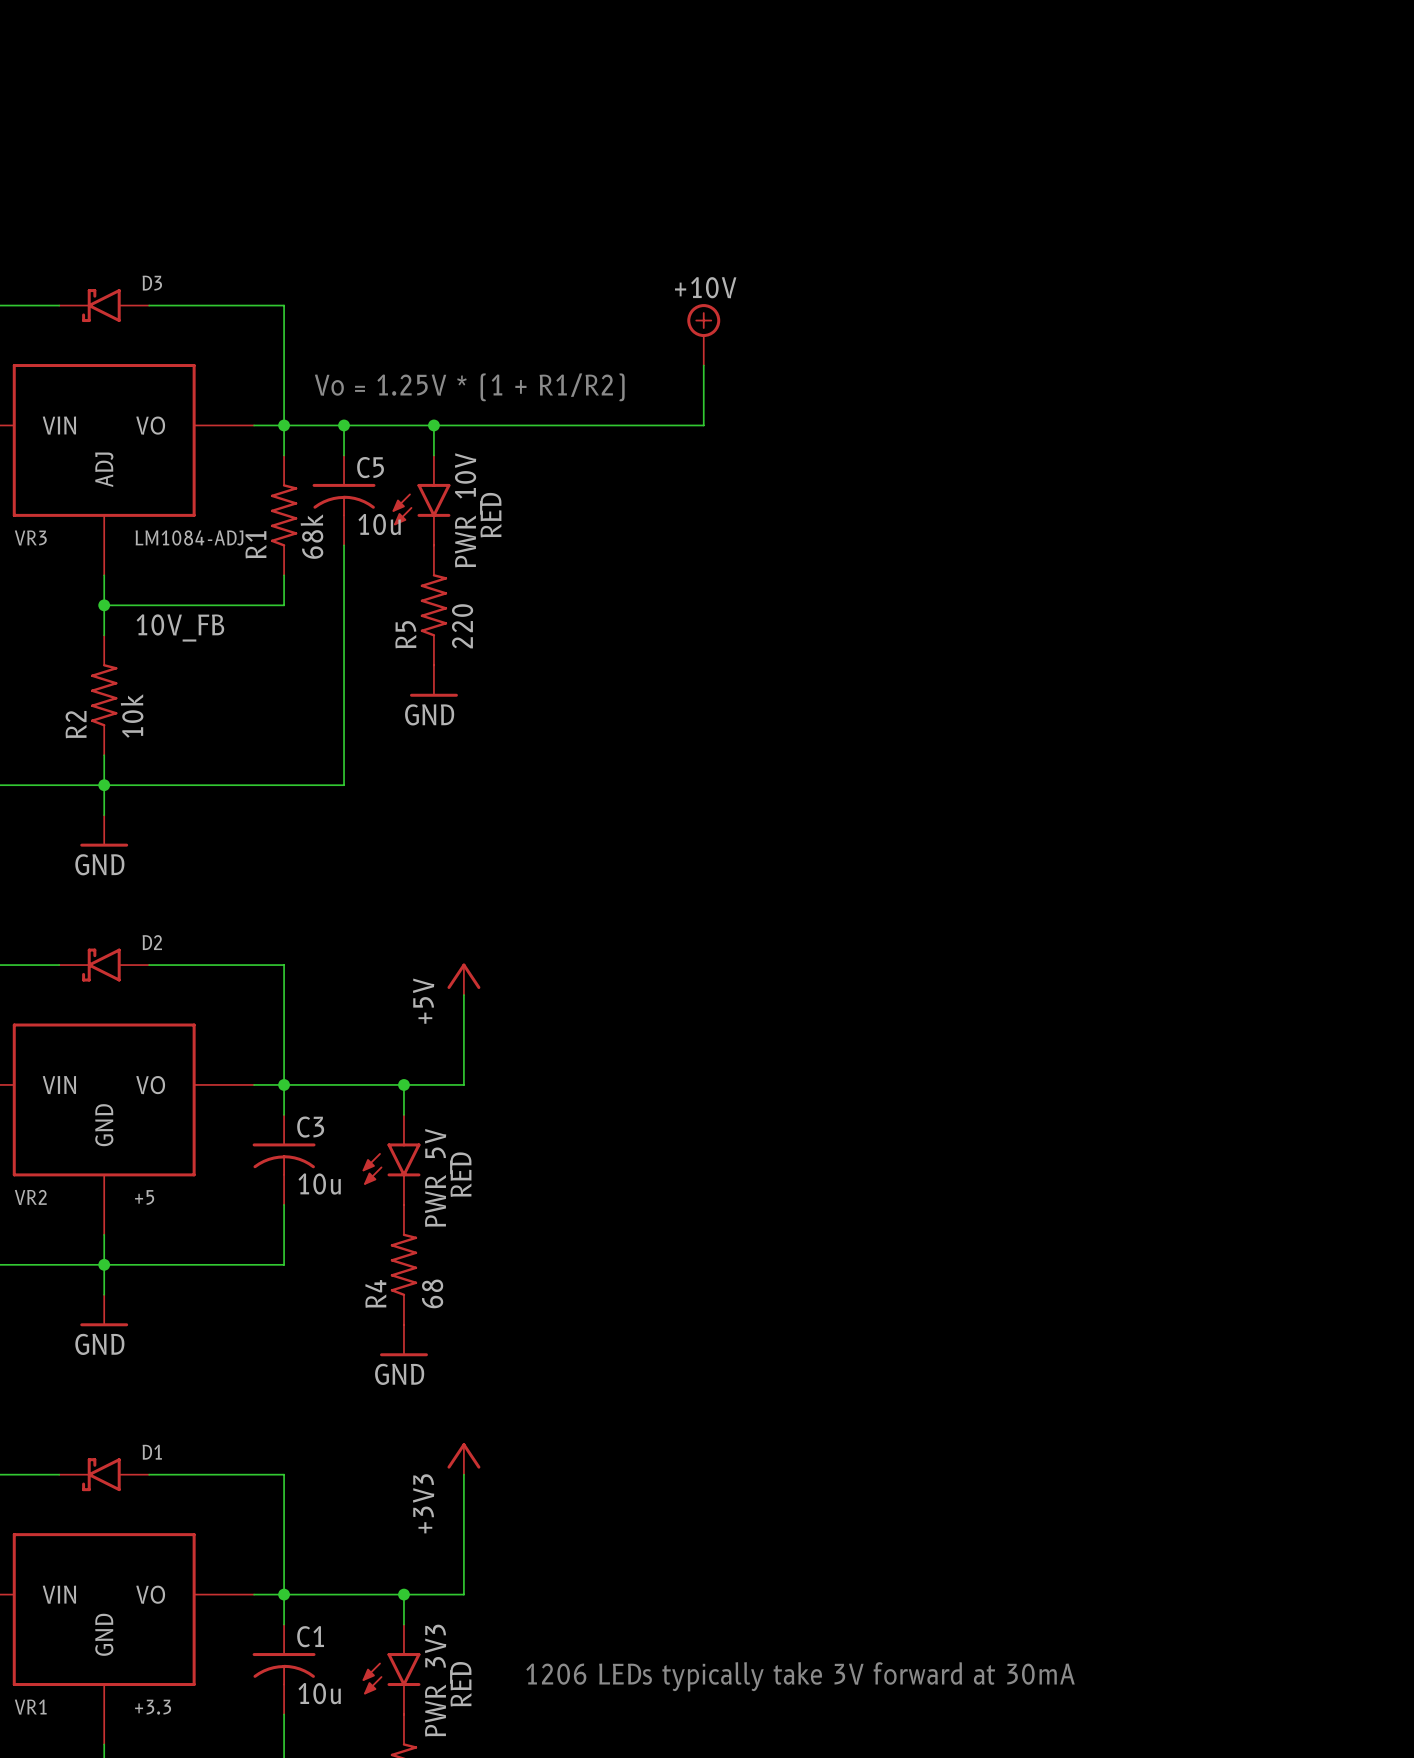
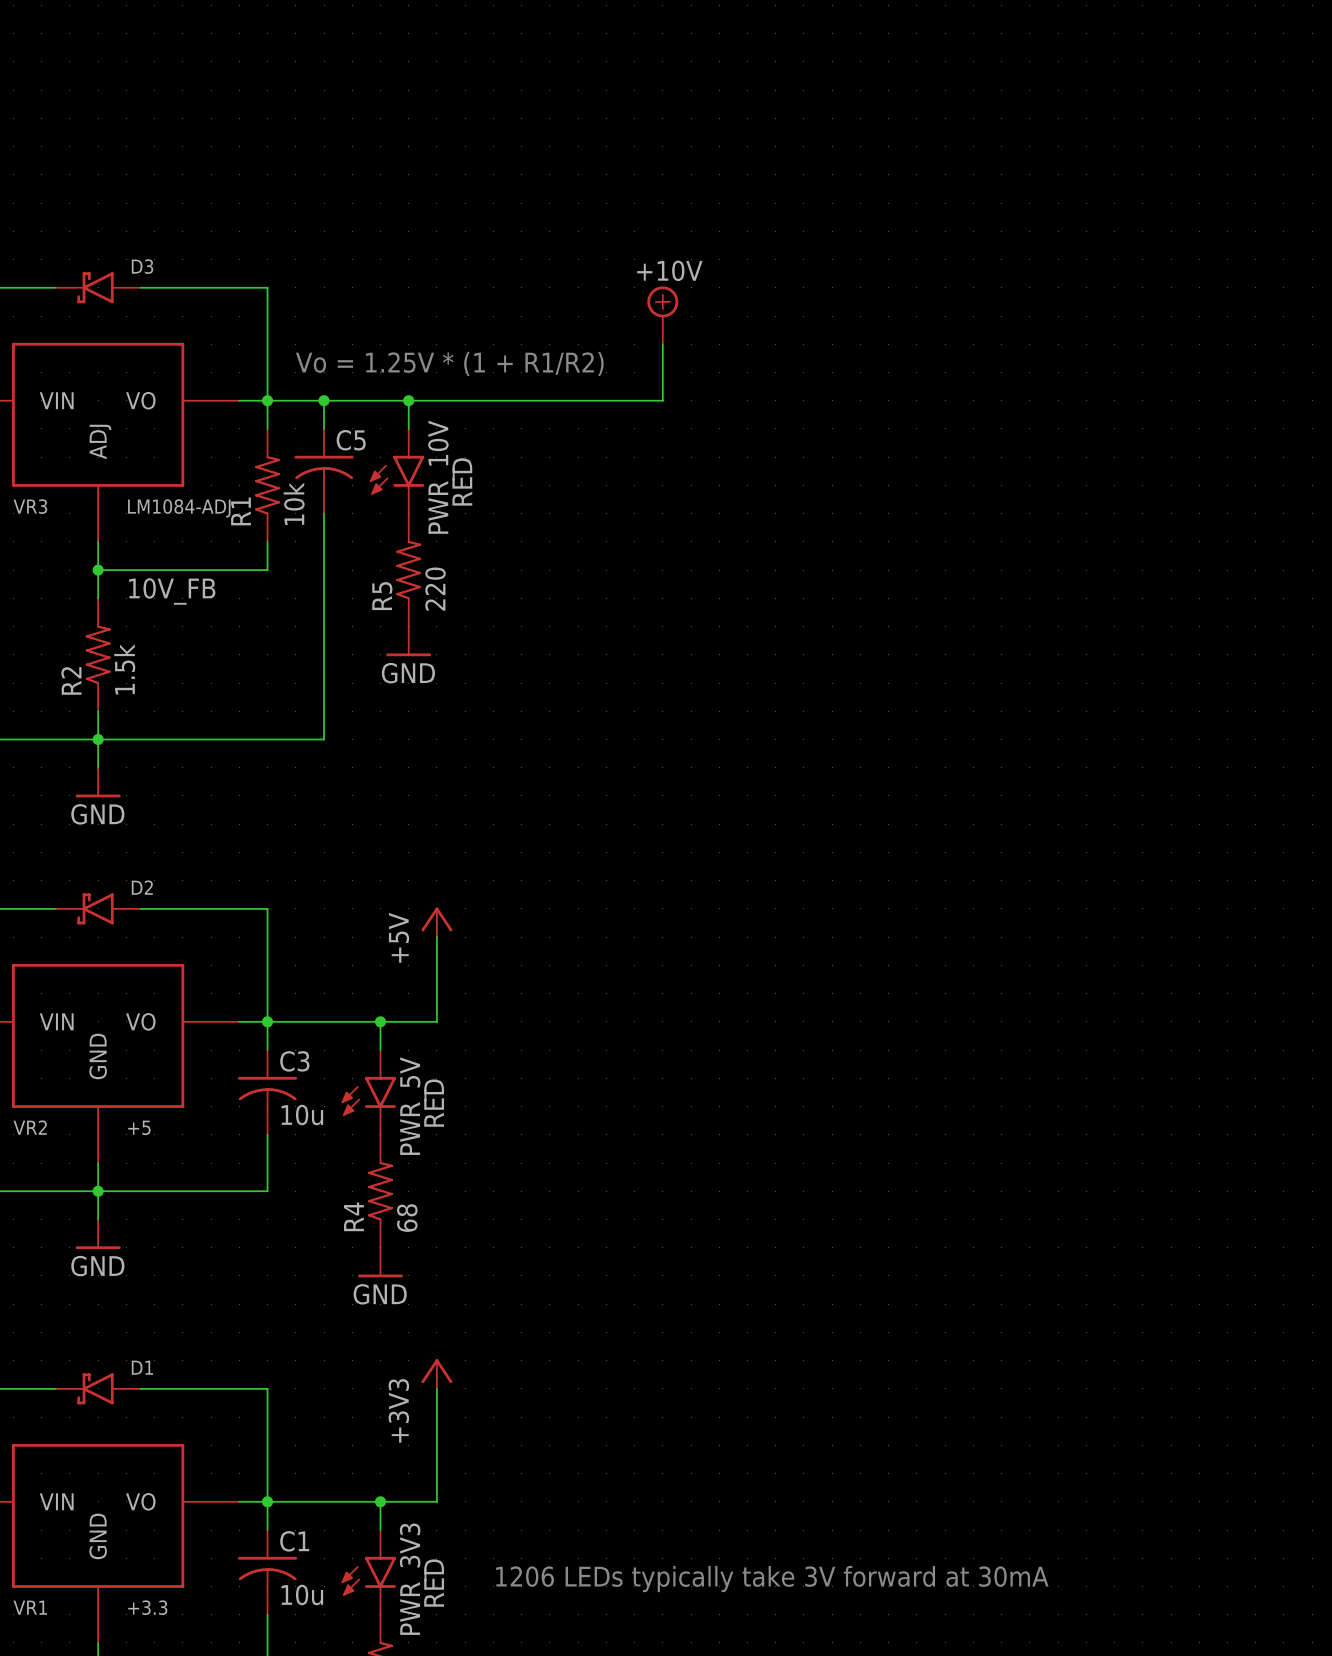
C5 value: 10u (379, 524) -> none
R1 value: 68k (311, 536) -> 10k (294, 503)
R2 value: 10k (132, 716) -> 1.5k (124, 669)

